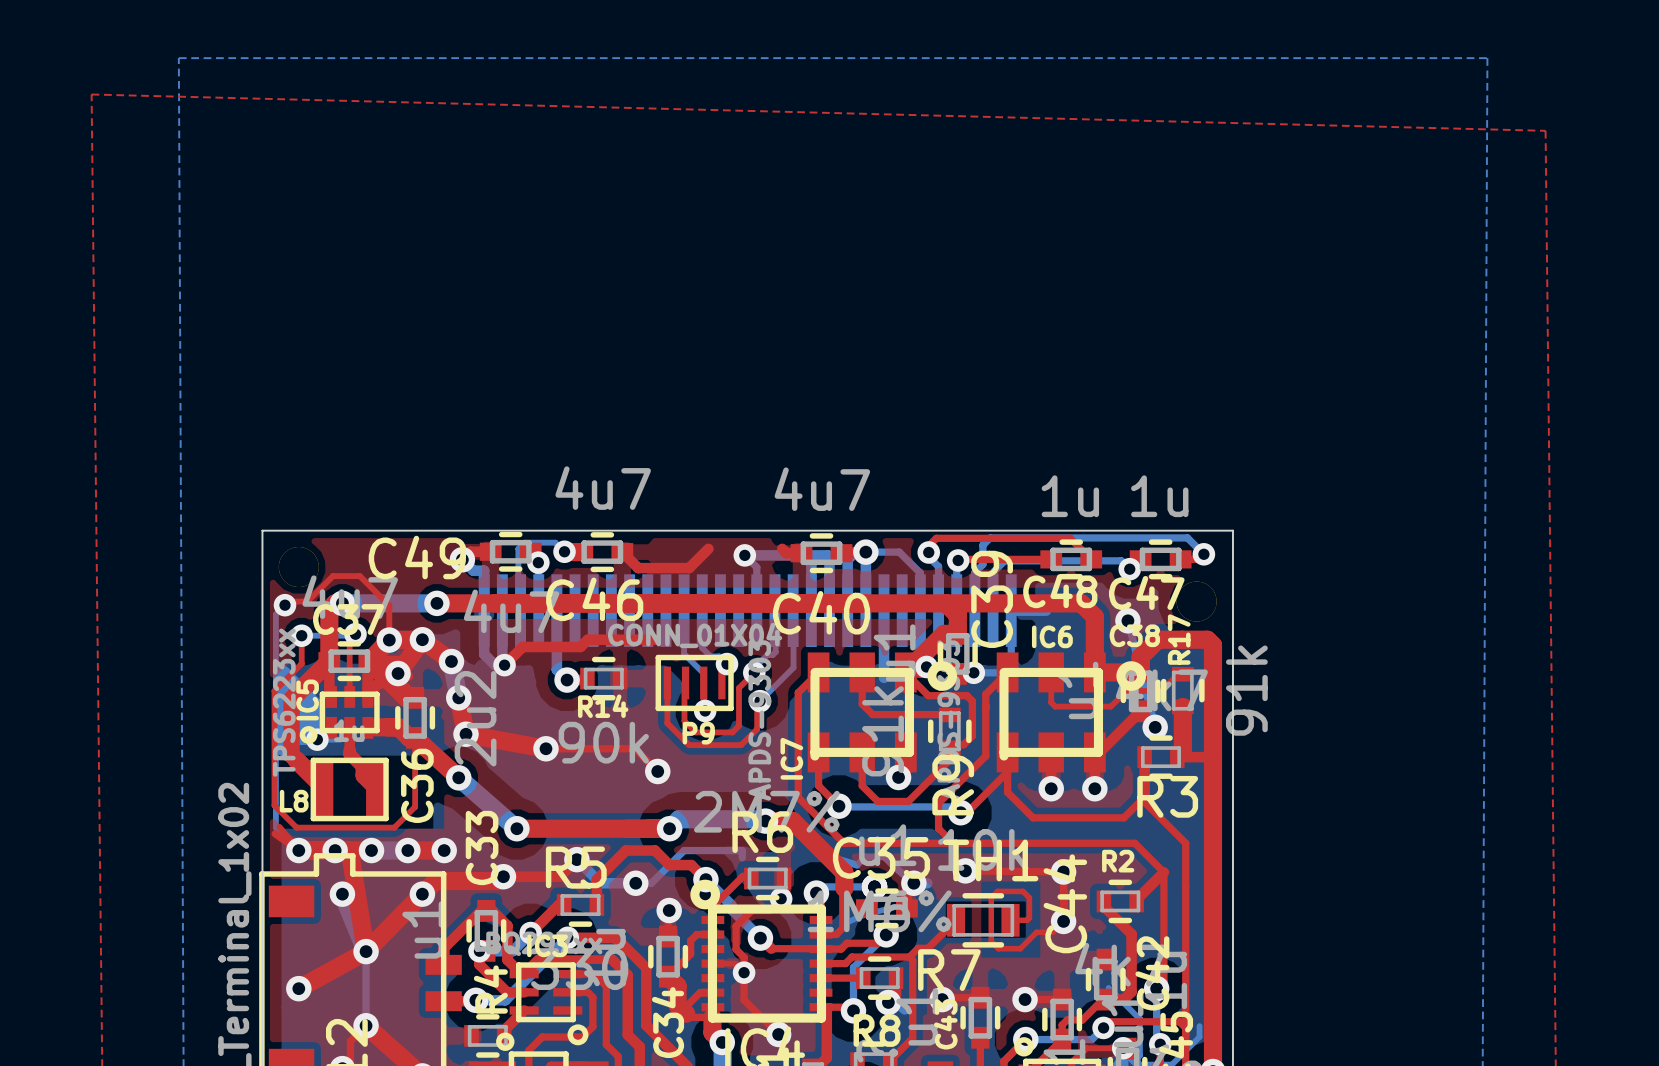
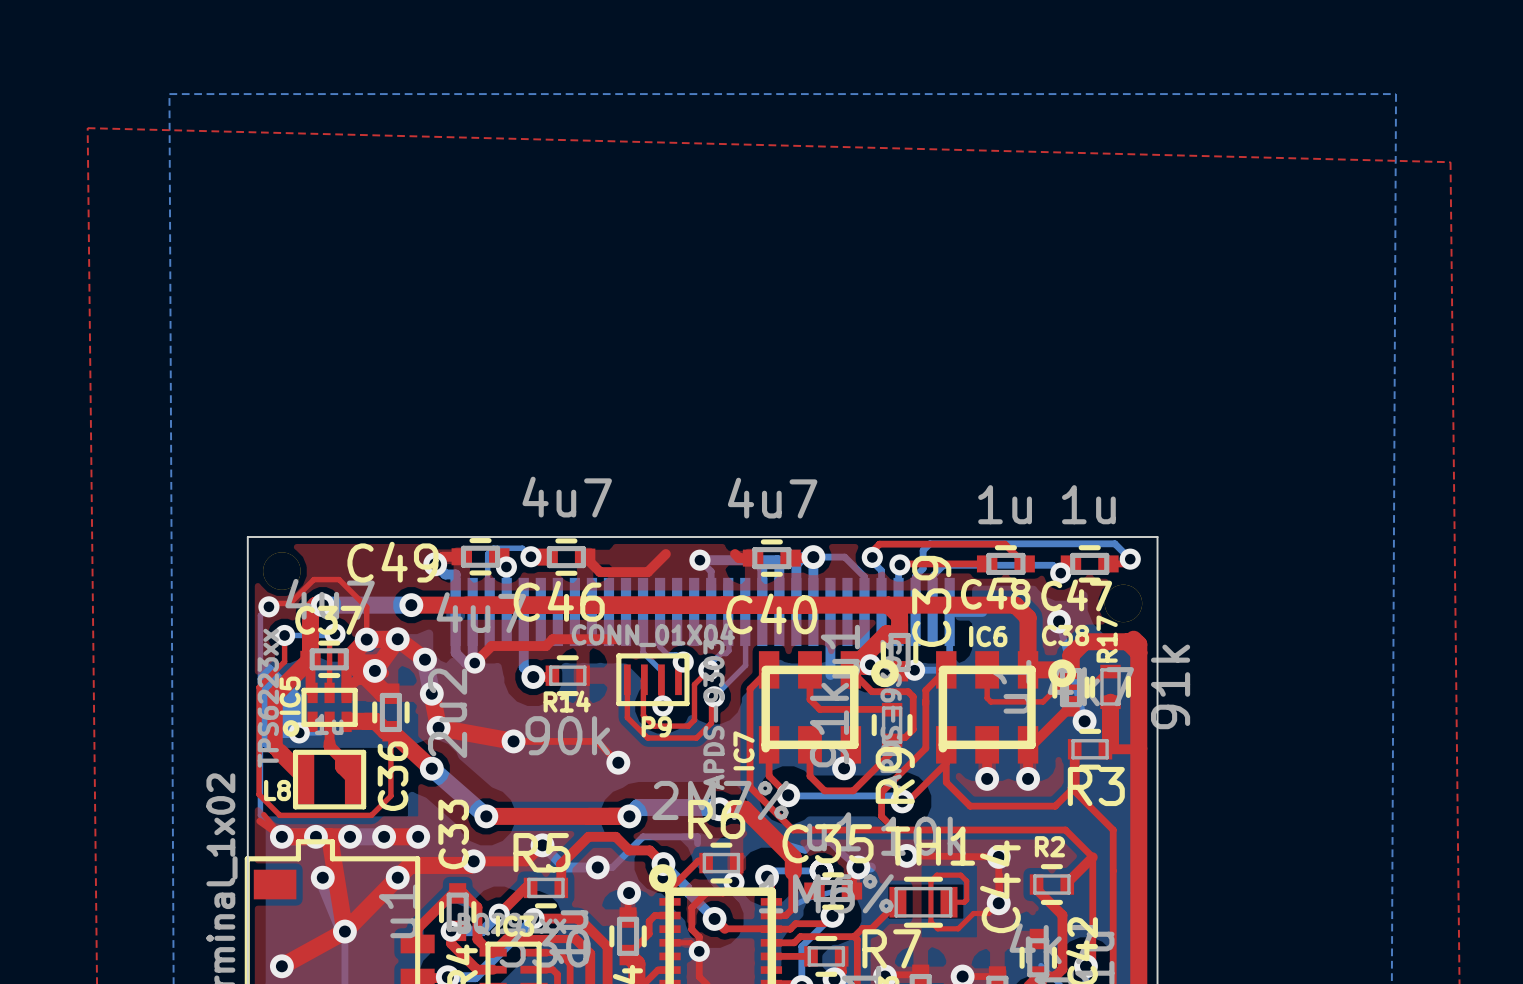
top track: (1207, 639) (1157, 639) (1155, 642) -> (1138, 652) (1127, 641) (1084, 641)

